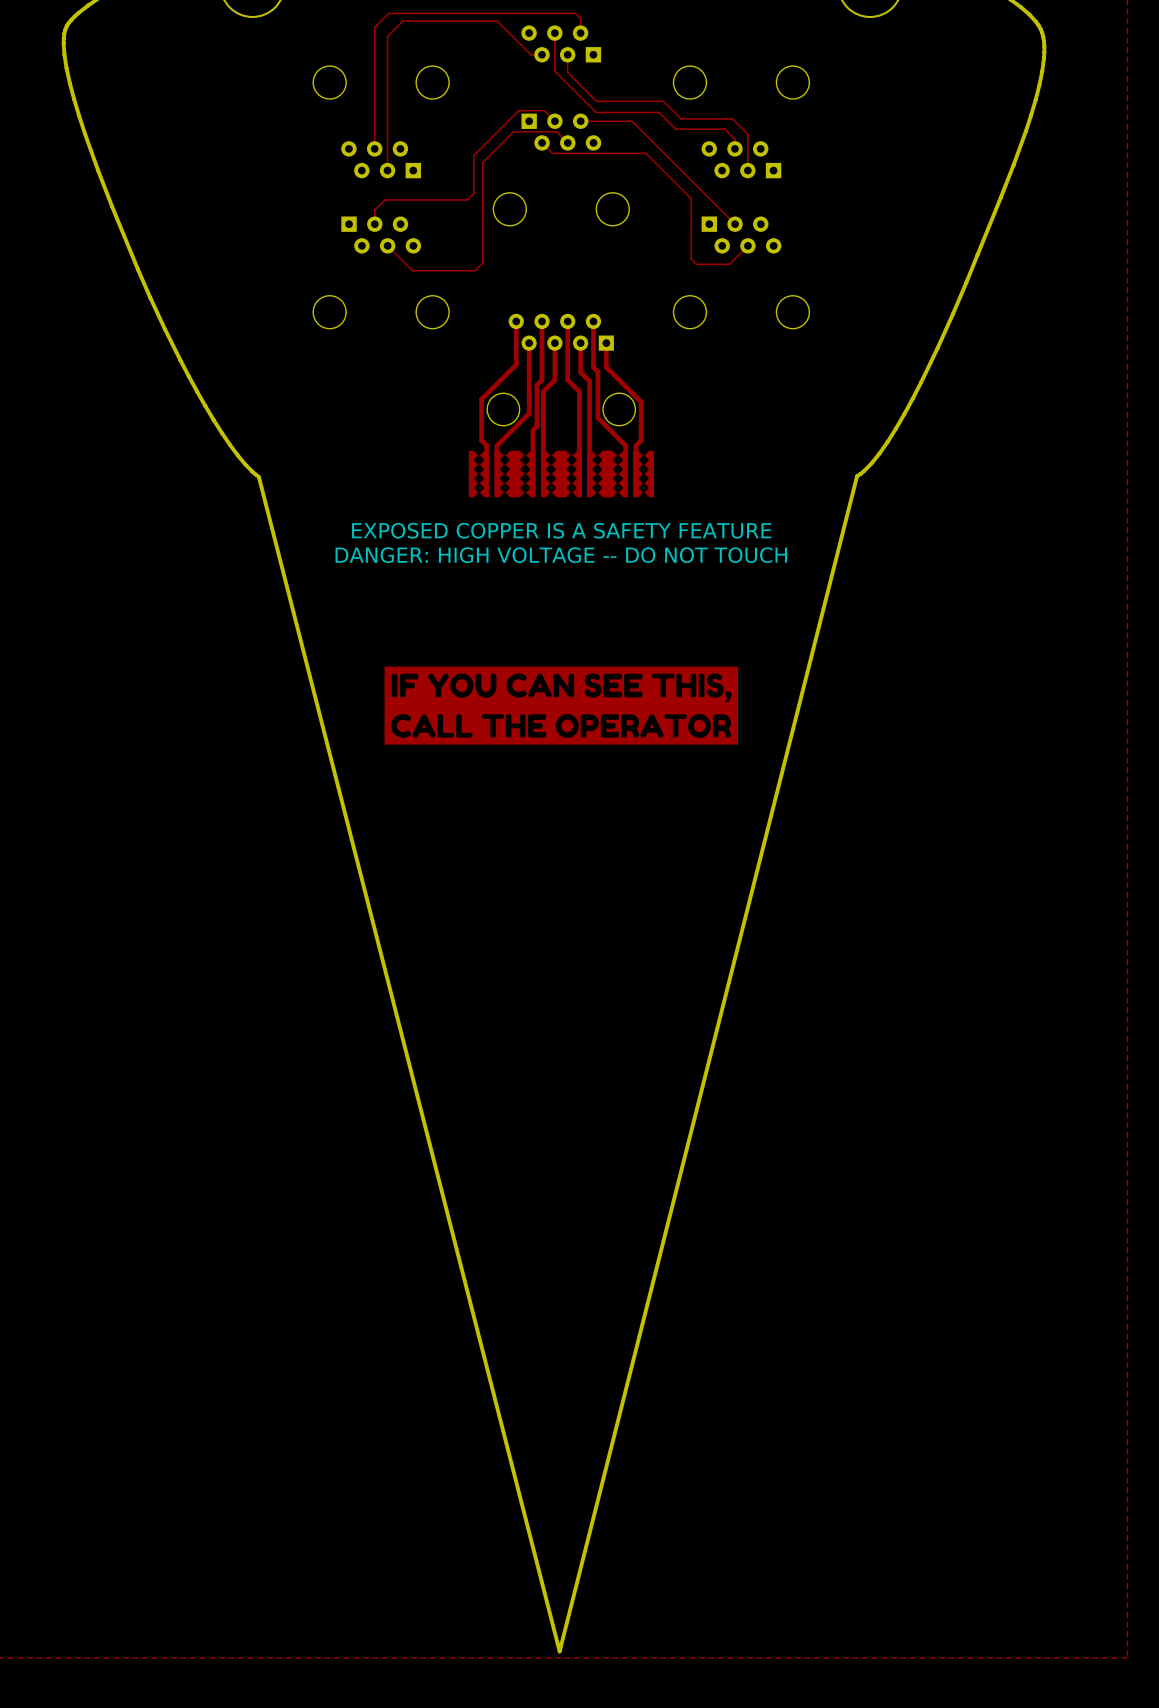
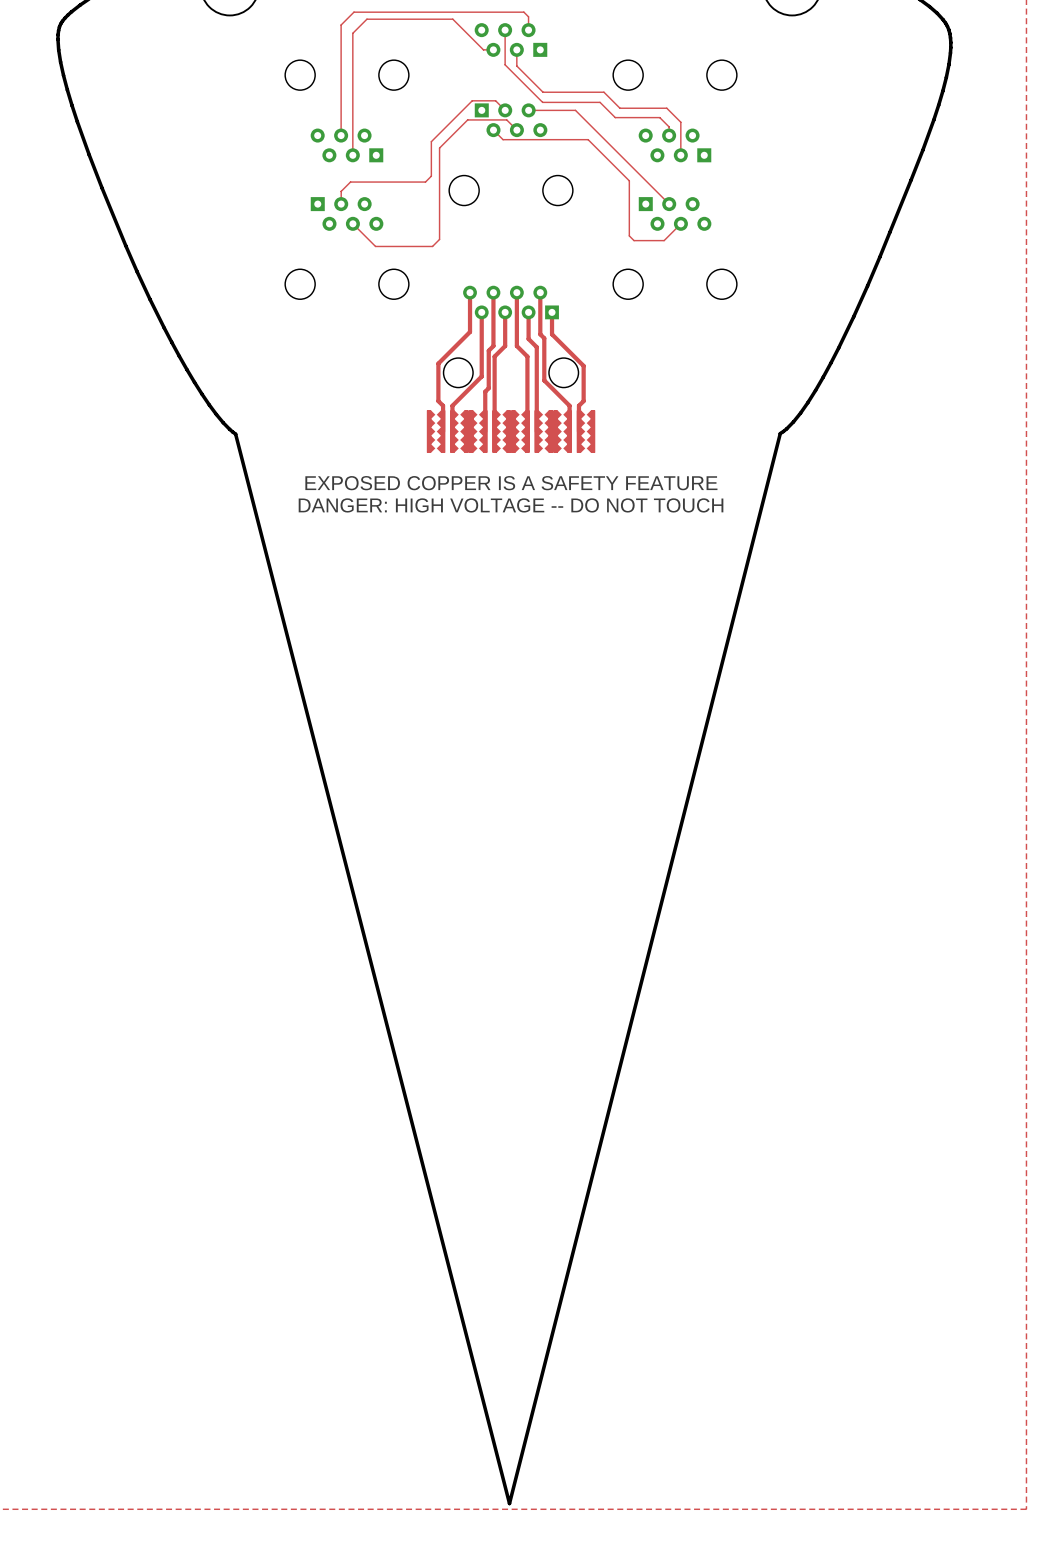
drawing: [384, 666, 739, 745] -> none

